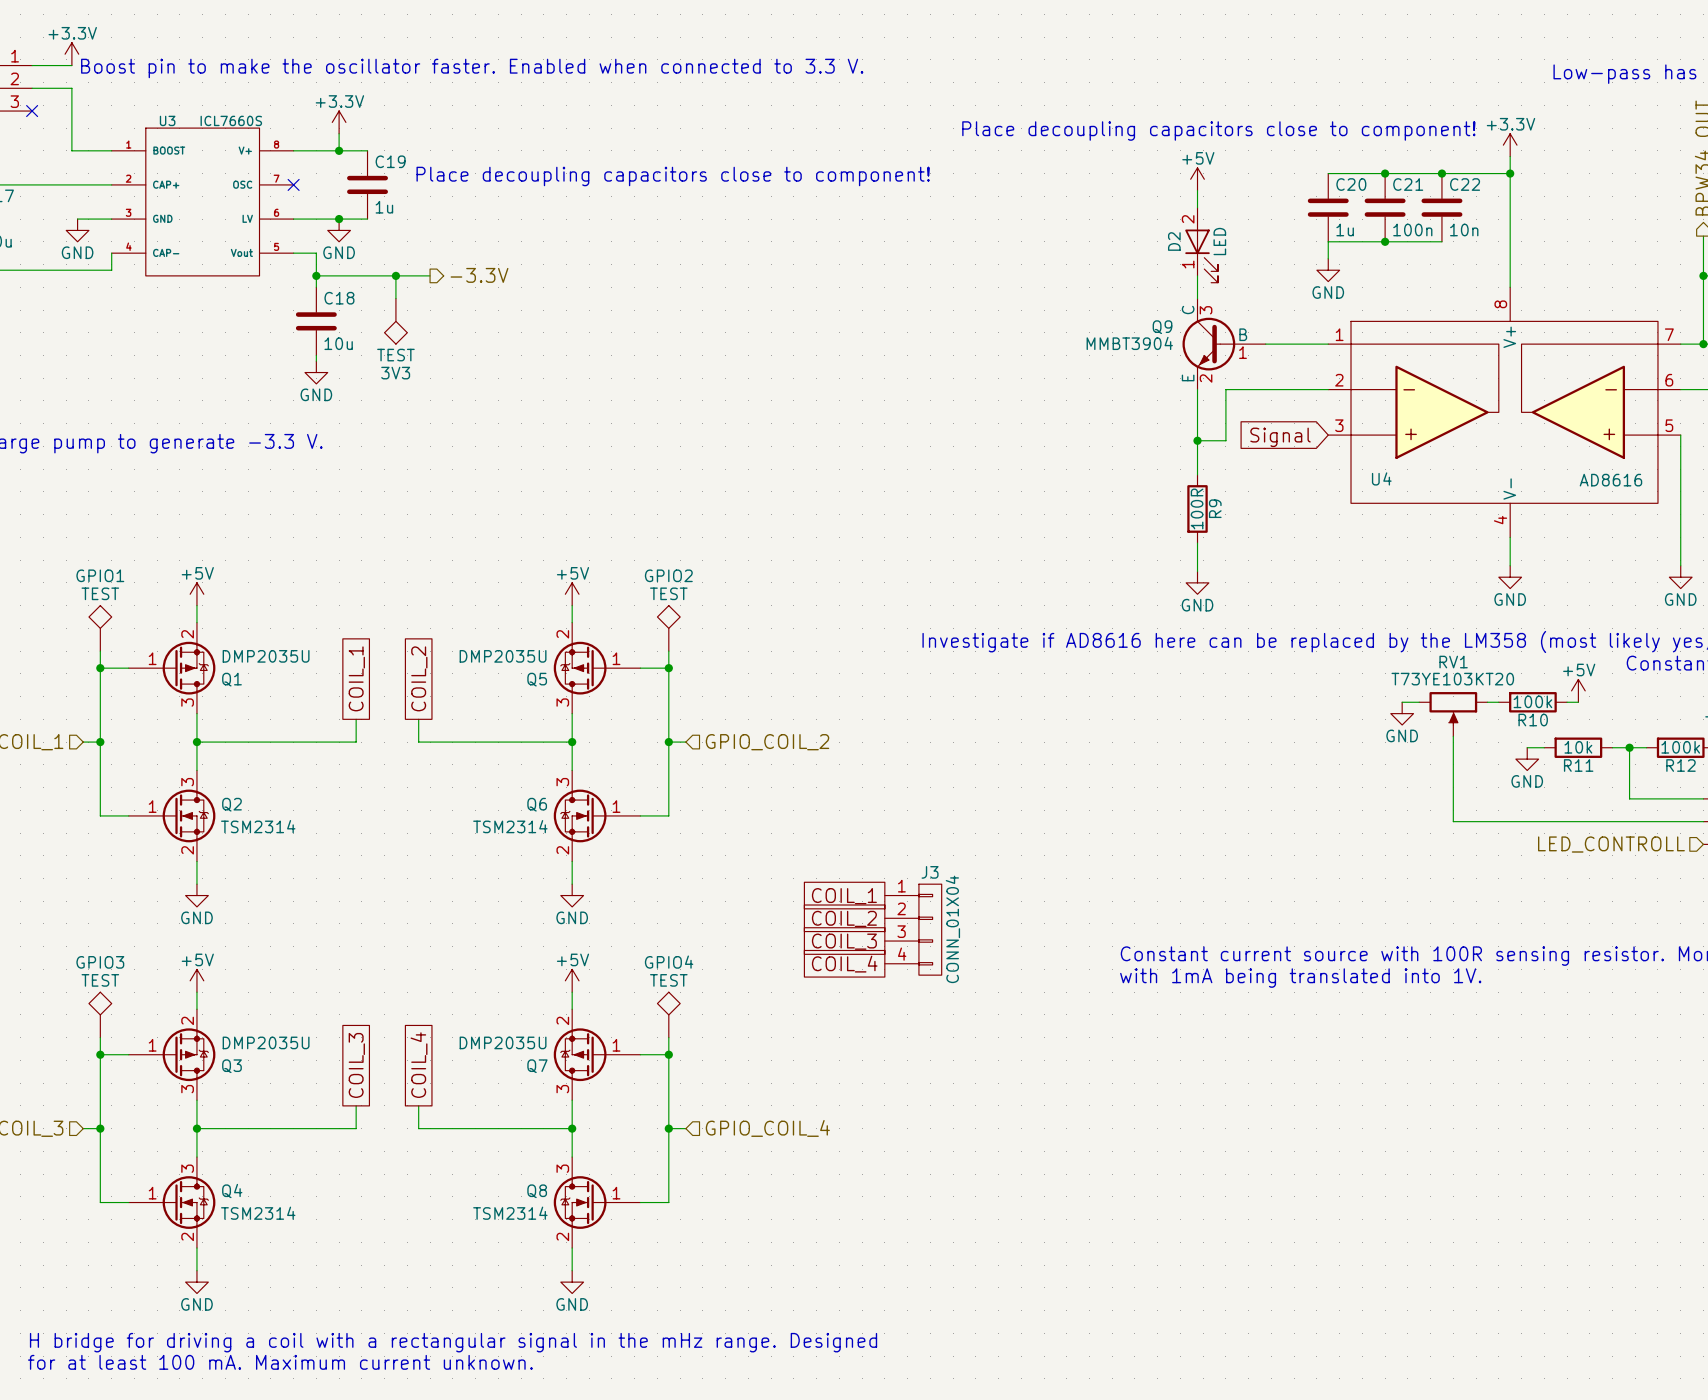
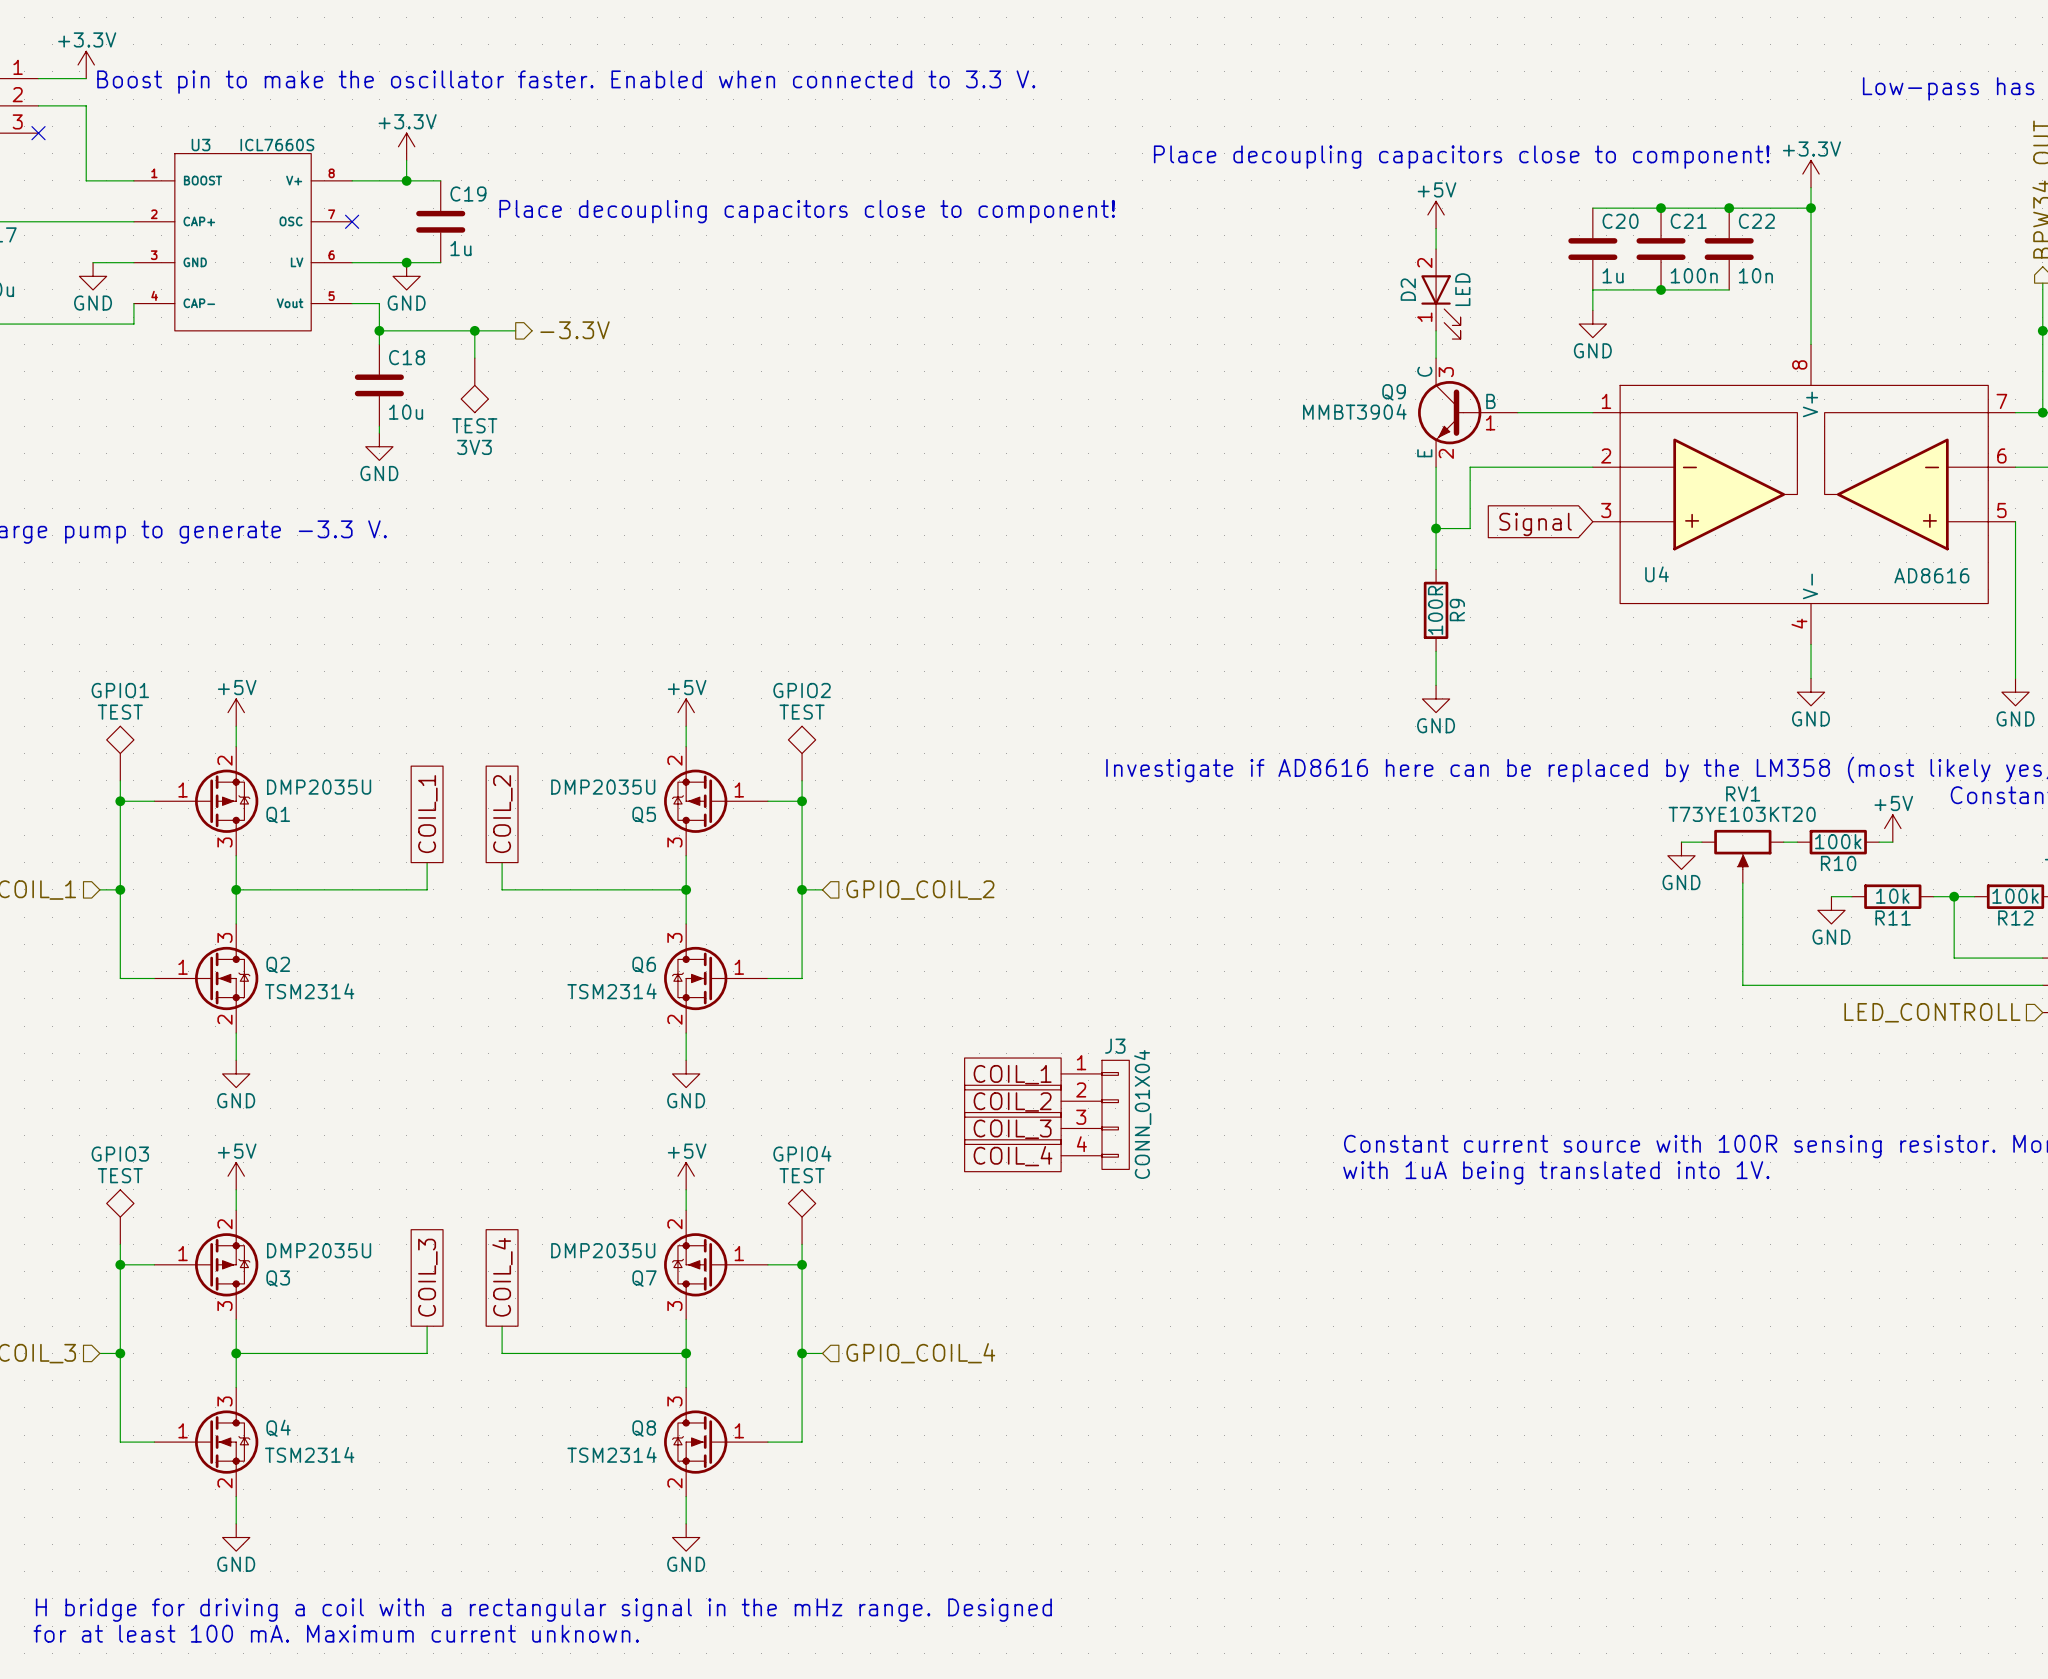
text: with 1mA being translated into 1V. (1300, 978) -> with 1uA being translated into 1V. (1556, 1172)

